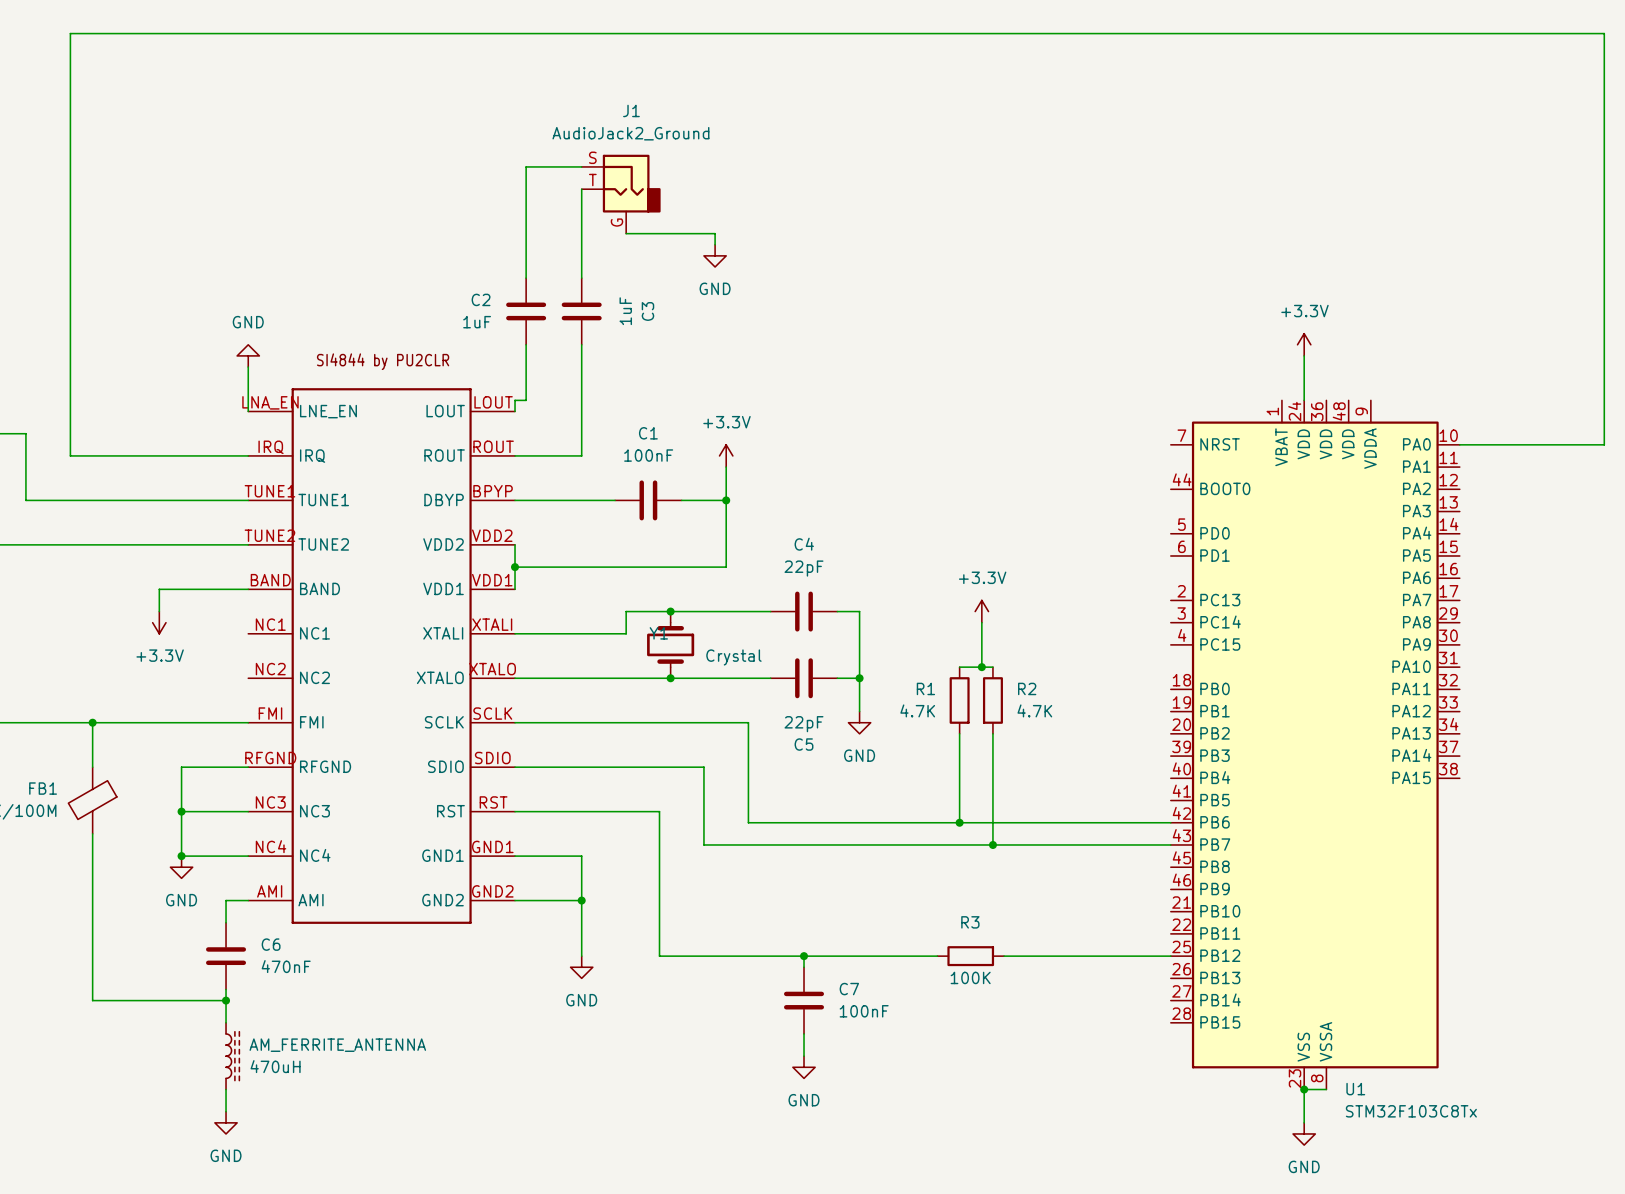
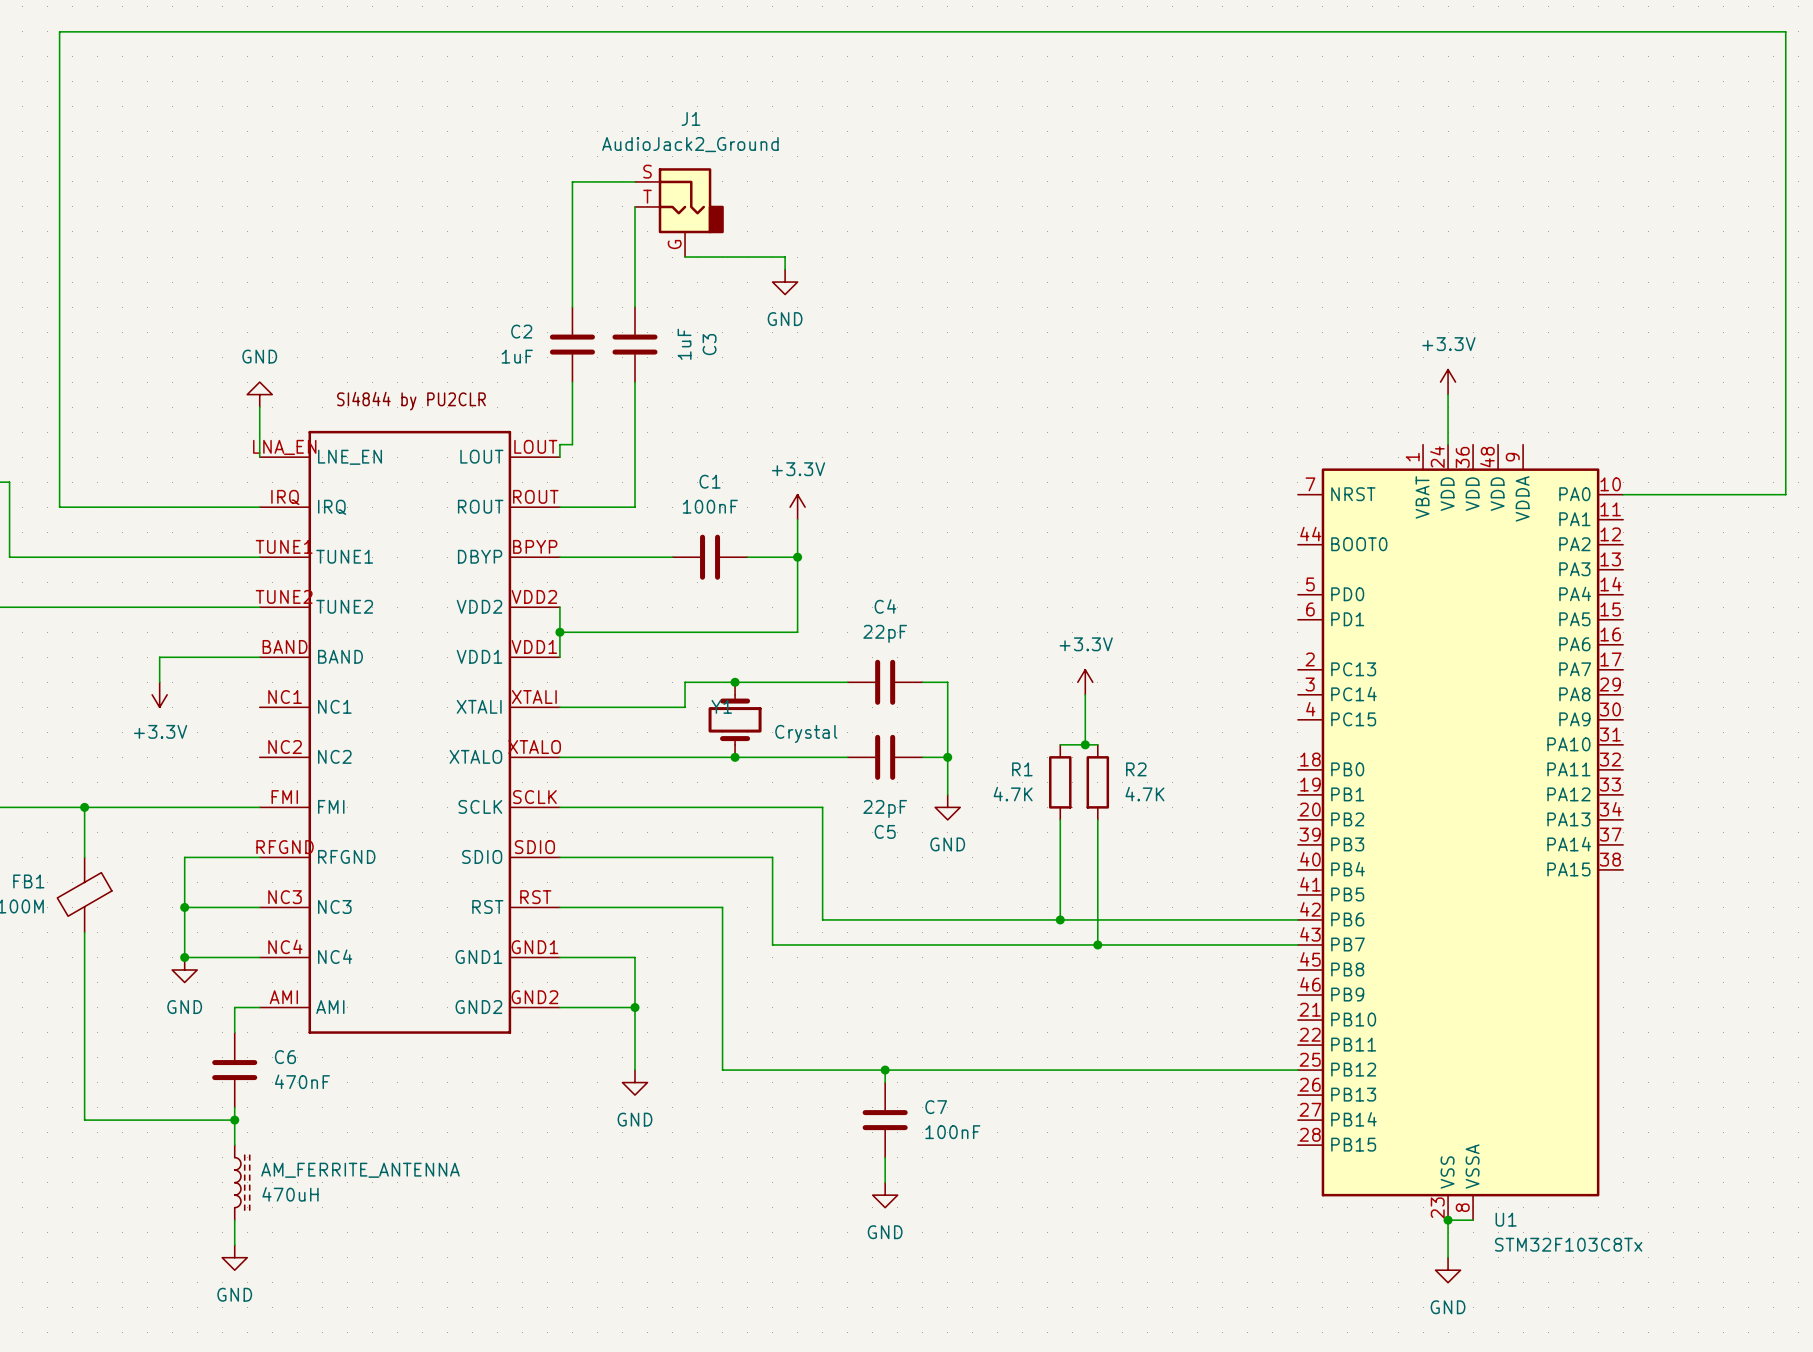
wire: none -> (1035, 1070) (1110, 1070)
R3: 100K (970, 956) -> none

